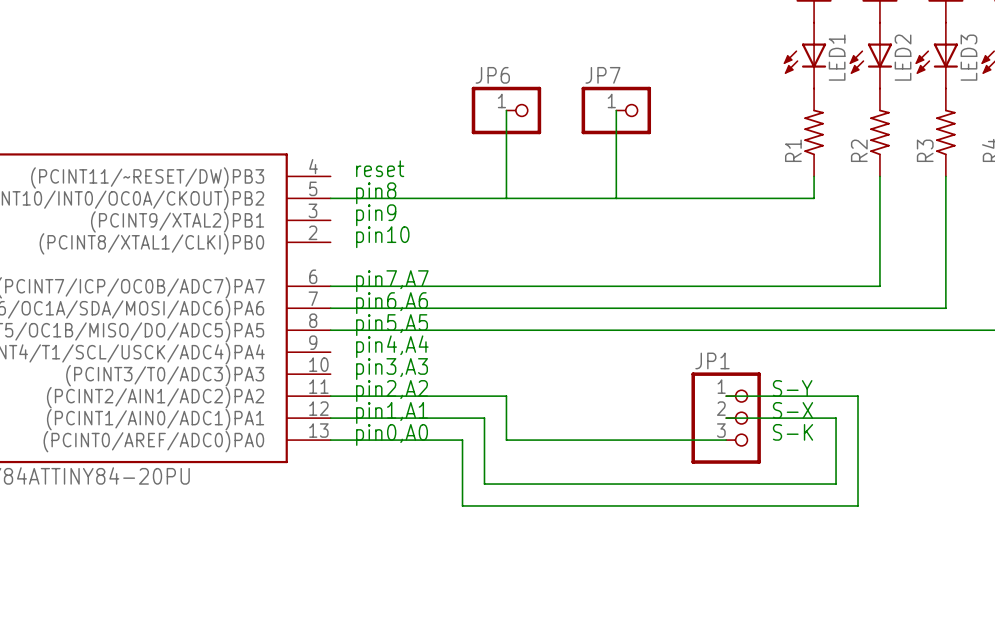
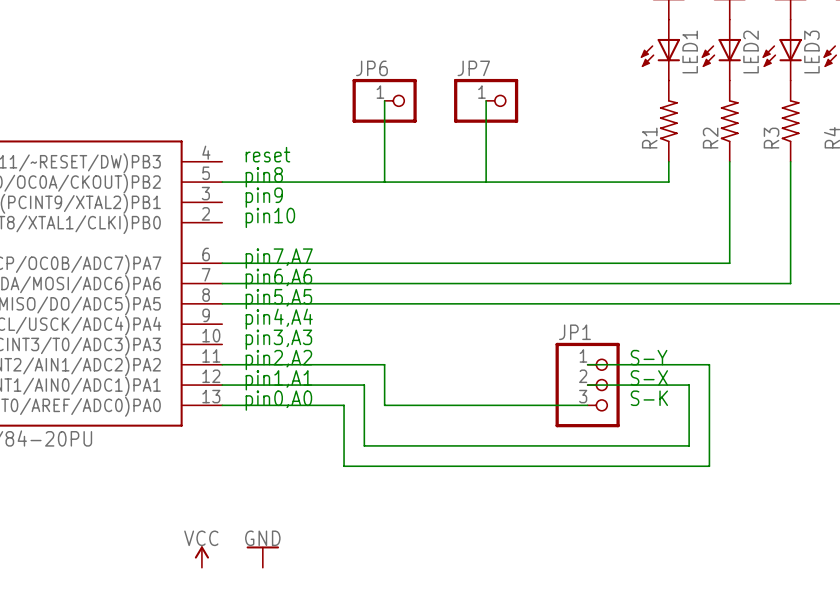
power symbol: none -> VCC (201, 557)
power symbol: none -> GND (262, 557)

